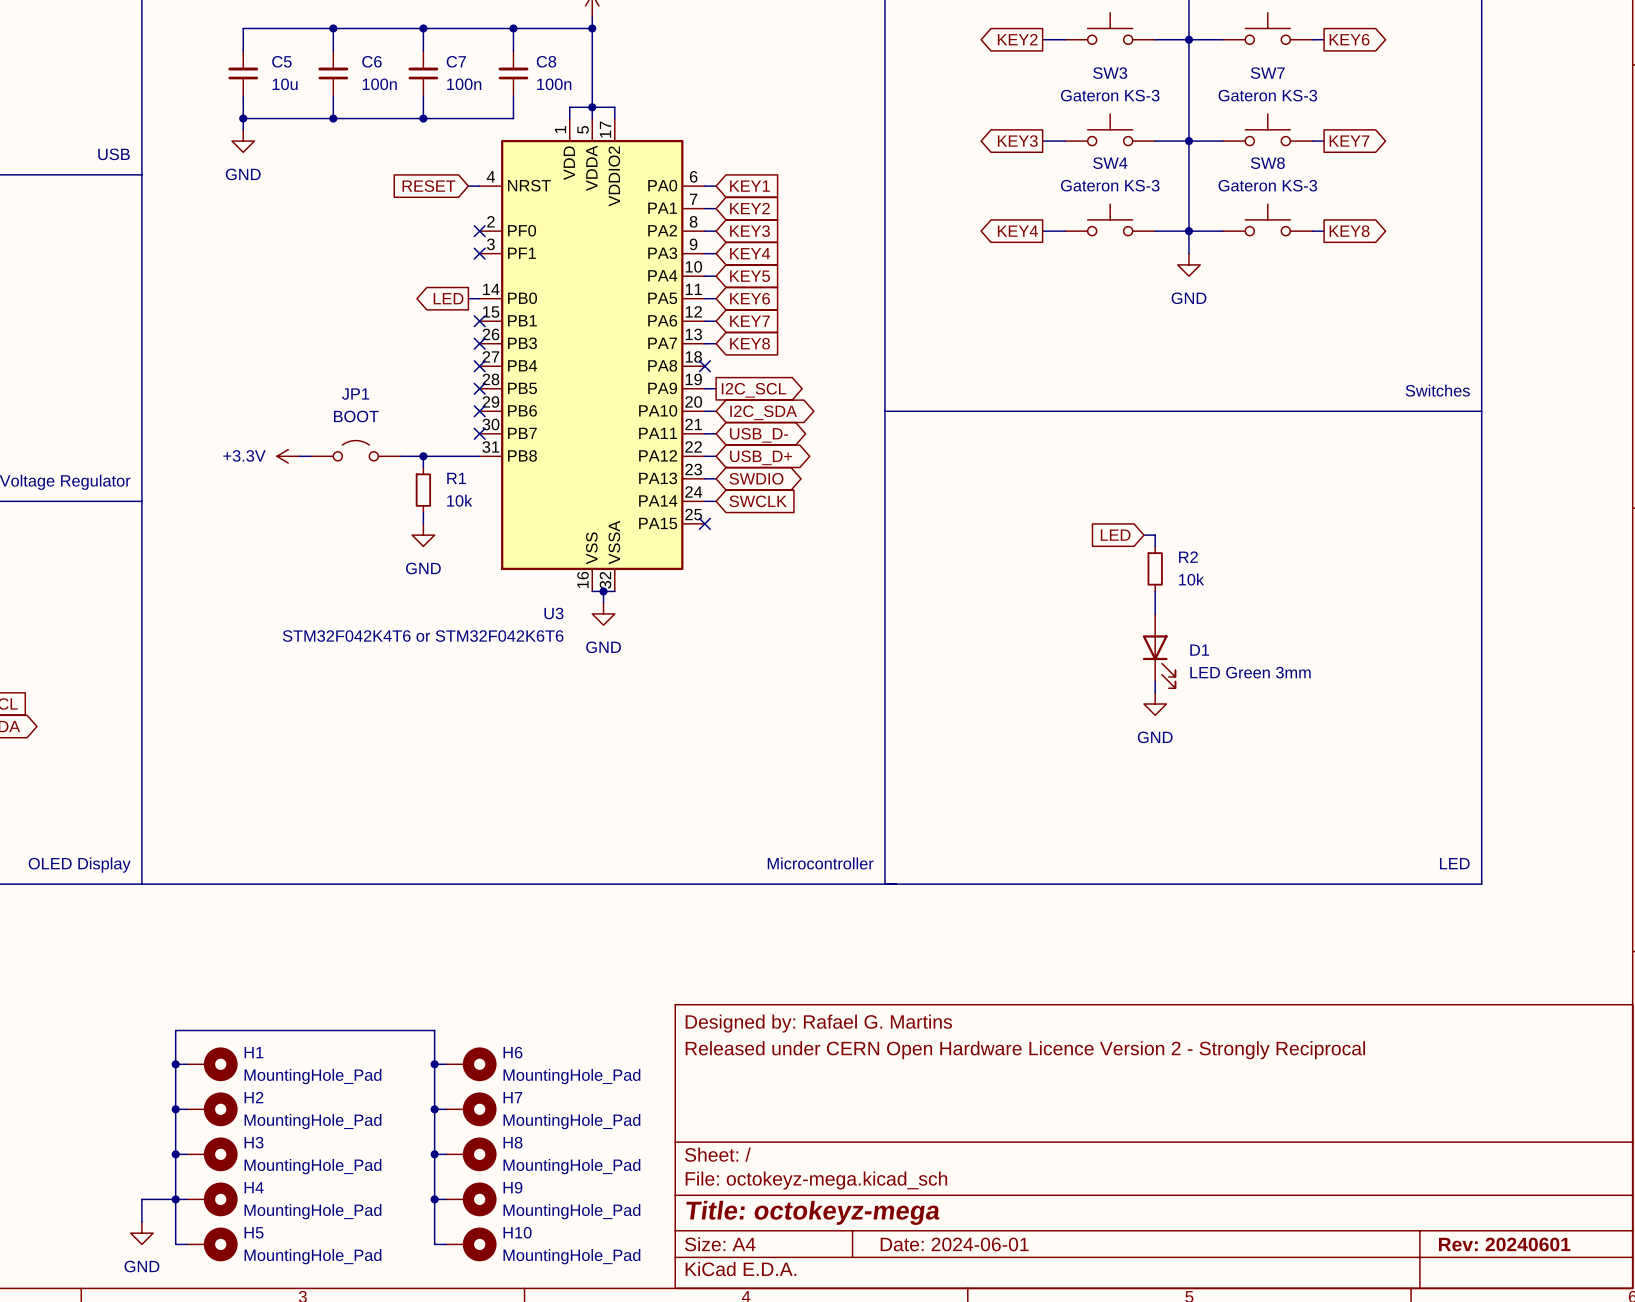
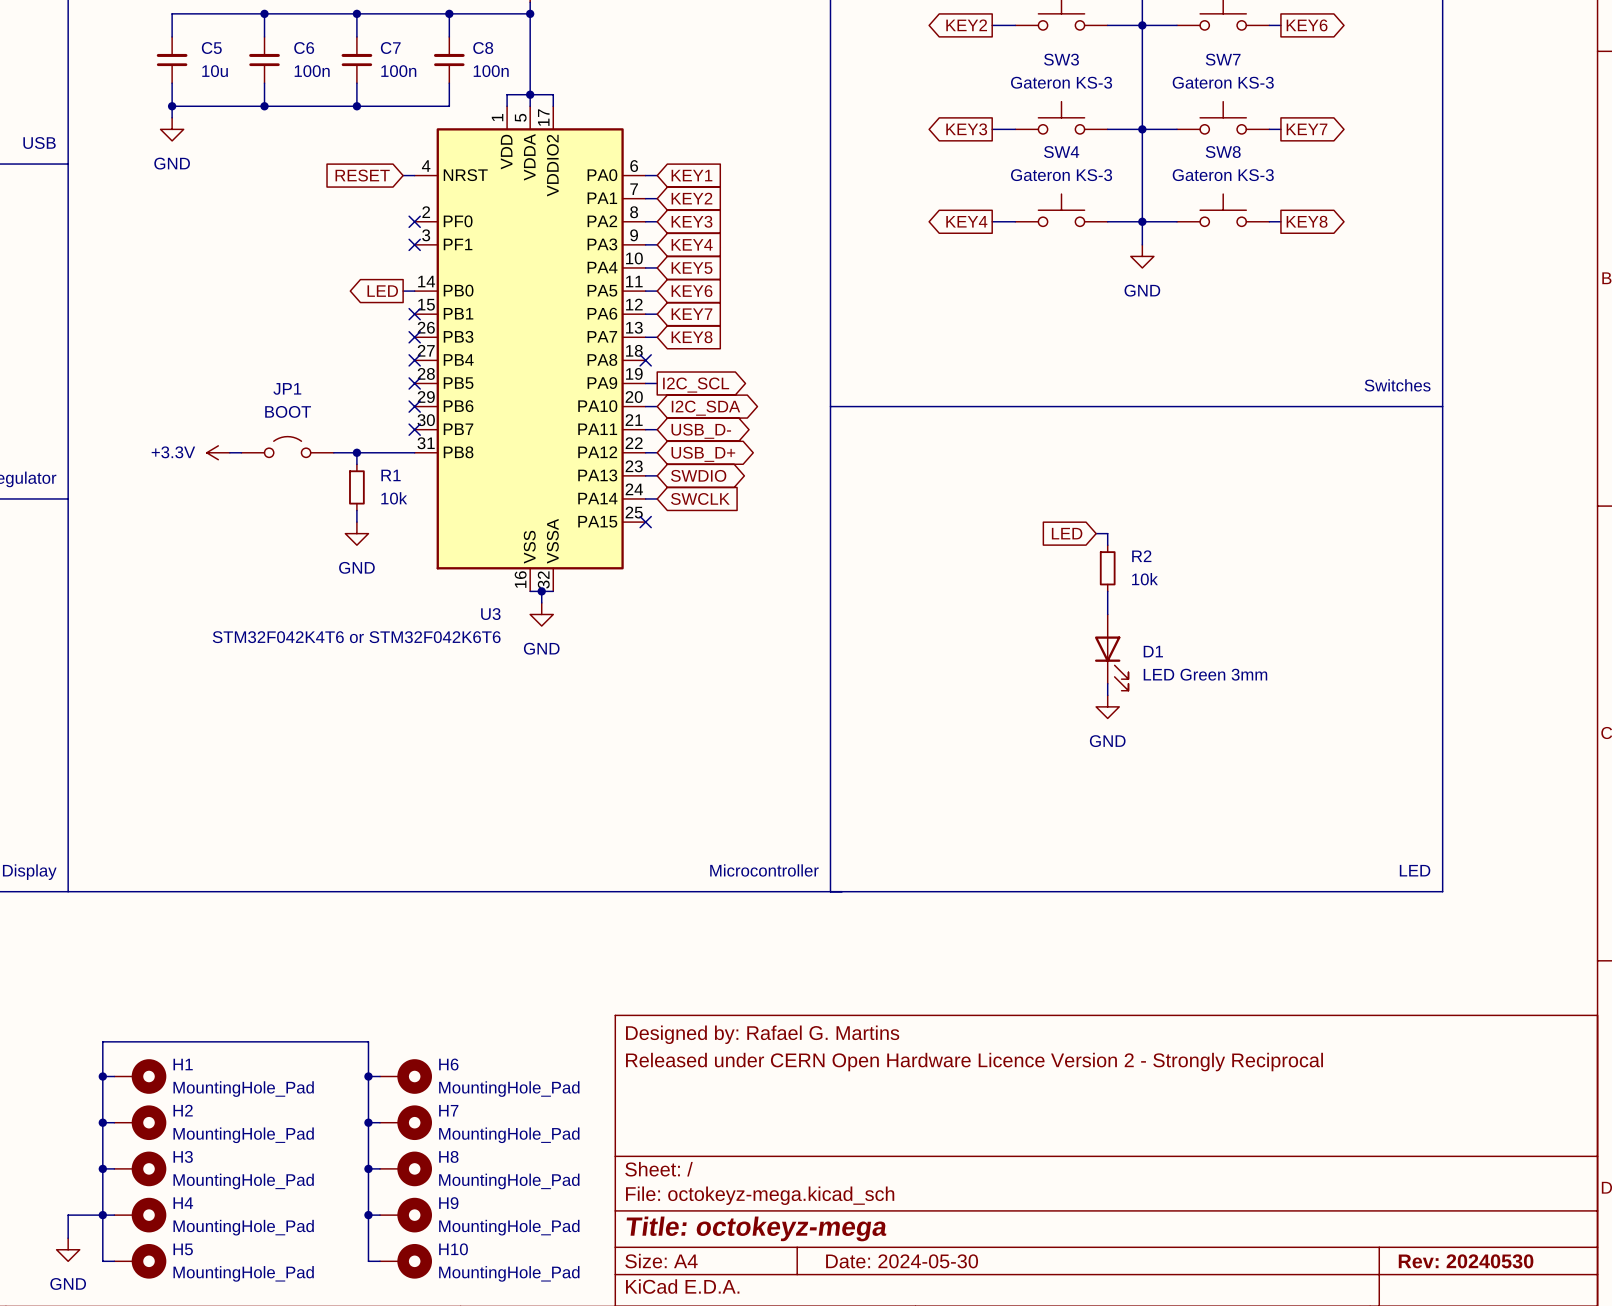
title block: Date: 2024-06-01 (954, 1244) -> Date: 2024-05-30 (902, 1261)
title block: Rev: 20240601 (1504, 1244) -> Rev: 20240530 (1466, 1261)

